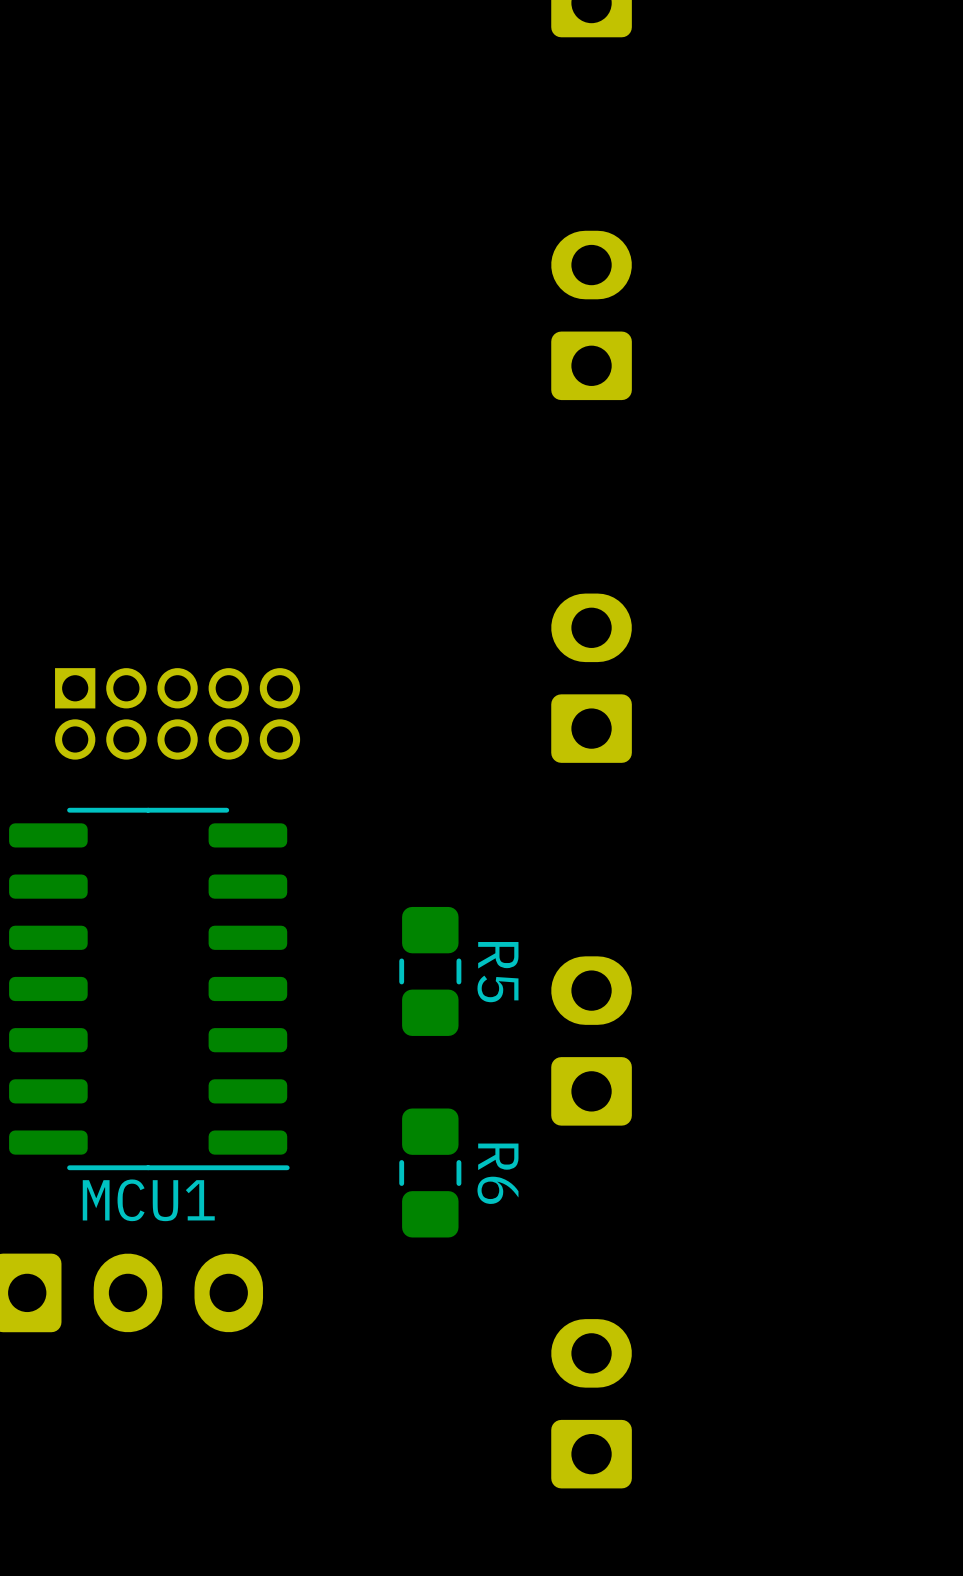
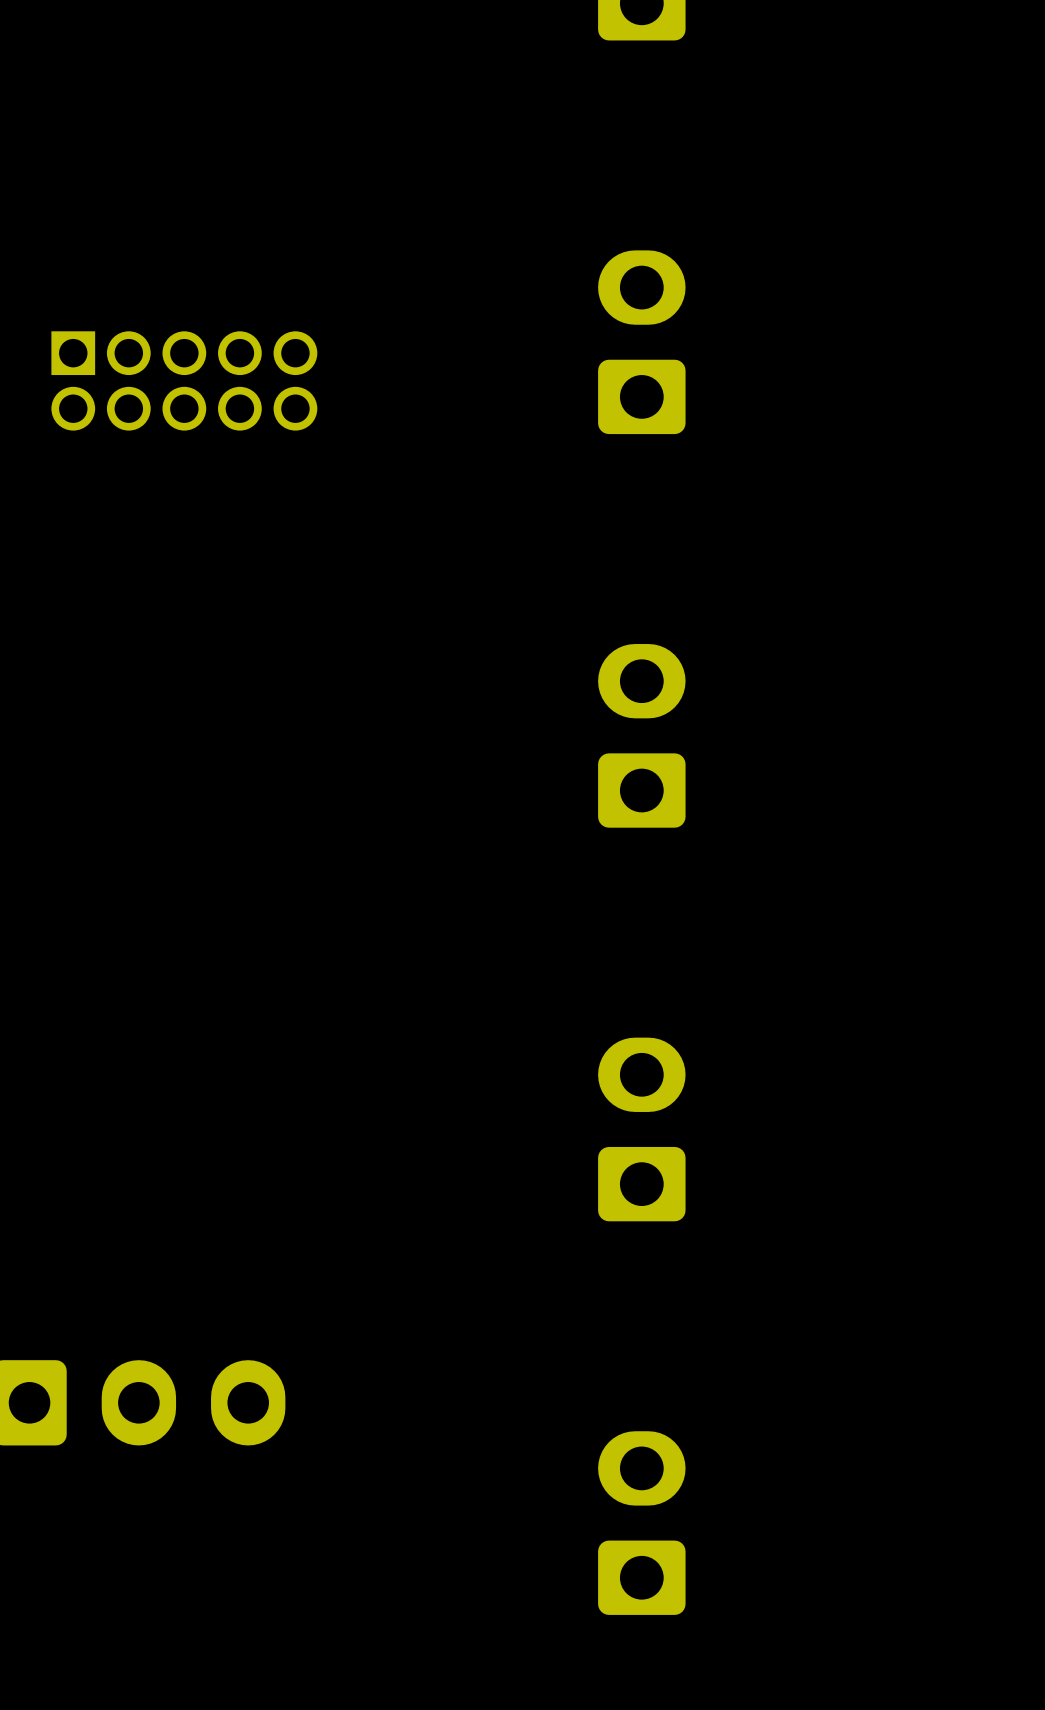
part position: (177, 713) -> (184, 380)
R5: (430, 971) -> none
MCU1: (149, 988) -> none
R6: (430, 1172) -> none

